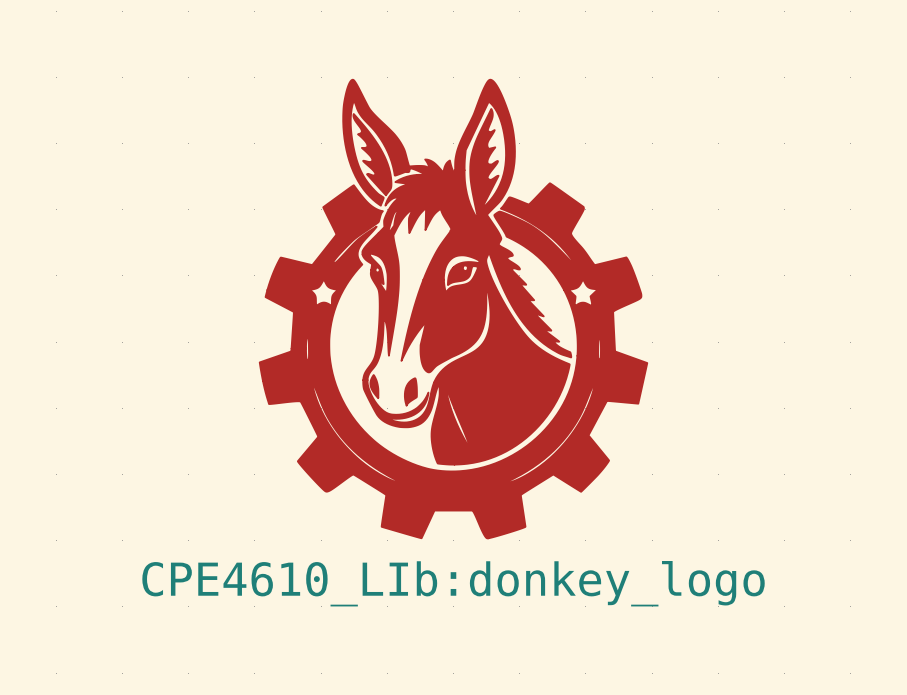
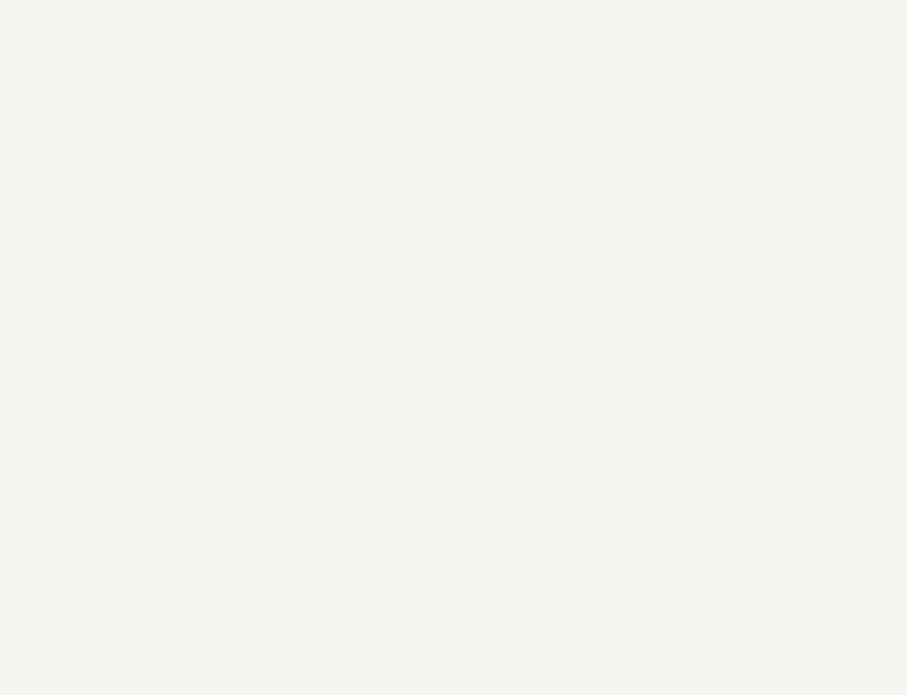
power symbol: (453, 309) -> none

